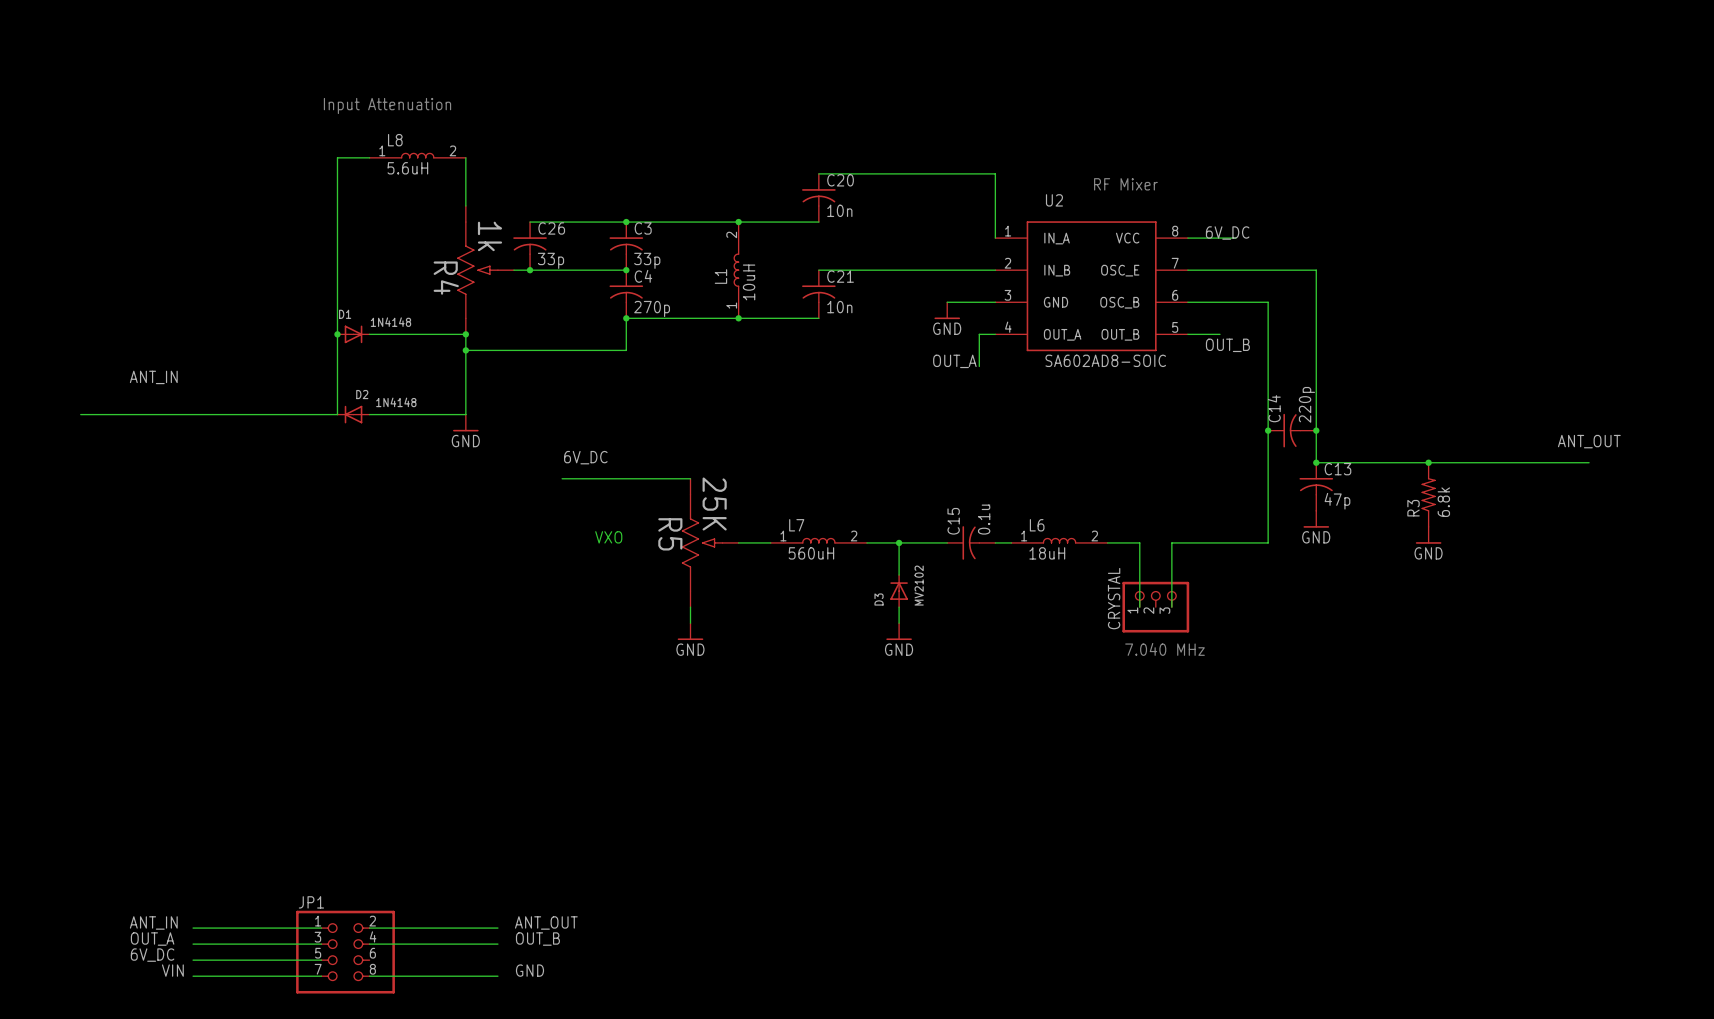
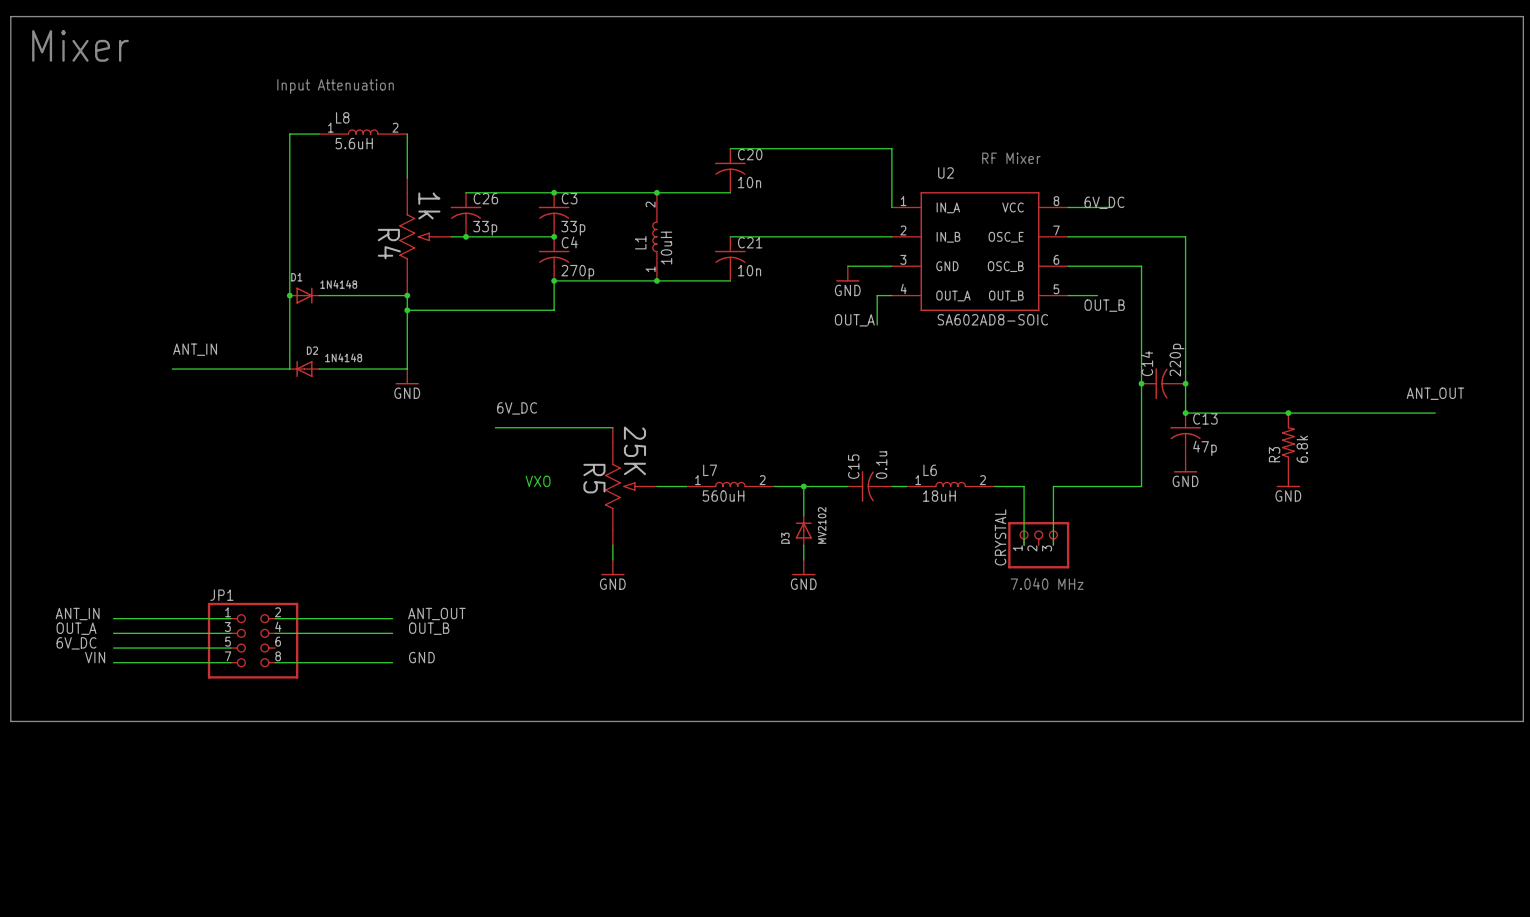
line: none -> (10, 16) (10, 721) (1523, 721) (1523, 16) (10, 16)
text: none -> Mixer (80, 45)
label position: ANT_IN (153, 377) -> ANT_IN (195, 349)
wire: (80, 414) (209, 414) -> none
label: none -> ANT_IN (77, 614)
label: none -> ANT_OUT (436, 614)
wire: none -> (113, 618) (231, 618)
wire: none -> (275, 618) (392, 618)
label: none -> OUT_A (76, 628)
label: none -> OUT_B (429, 628)
wire: none -> (113, 633) (231, 633)
wire: none -> (275, 633) (392, 633)
label: none -> 6V_DC (76, 643)
wire: none -> (113, 648) (231, 648)
label: none -> VIN (95, 657)
label: none -> GND (421, 657)
wire: none -> (113, 662) (231, 662)
wire: none -> (275, 662) (392, 662)
label: ANT_IN (153, 922) -> none
label: ANT_OUT (546, 922) -> none
wire: (193, 928) (321, 928) -> none
wire: (369, 928) (497, 928) -> none
label: OUT_A (152, 939) -> none
label: OUT_B (537, 939) -> none
wire: (193, 944) (321, 944) -> none
wire: (369, 944) (497, 944) -> none
JP1 position: (345, 952) -> (253, 640)
label: 6V_DC (152, 955) -> none
wire: (193, 960) (321, 960) -> none
label: VIN (172, 970) -> none
label: GND (529, 970) -> none
wire: (193, 976) (321, 976) -> none
wire: (369, 976) (497, 976) -> none

